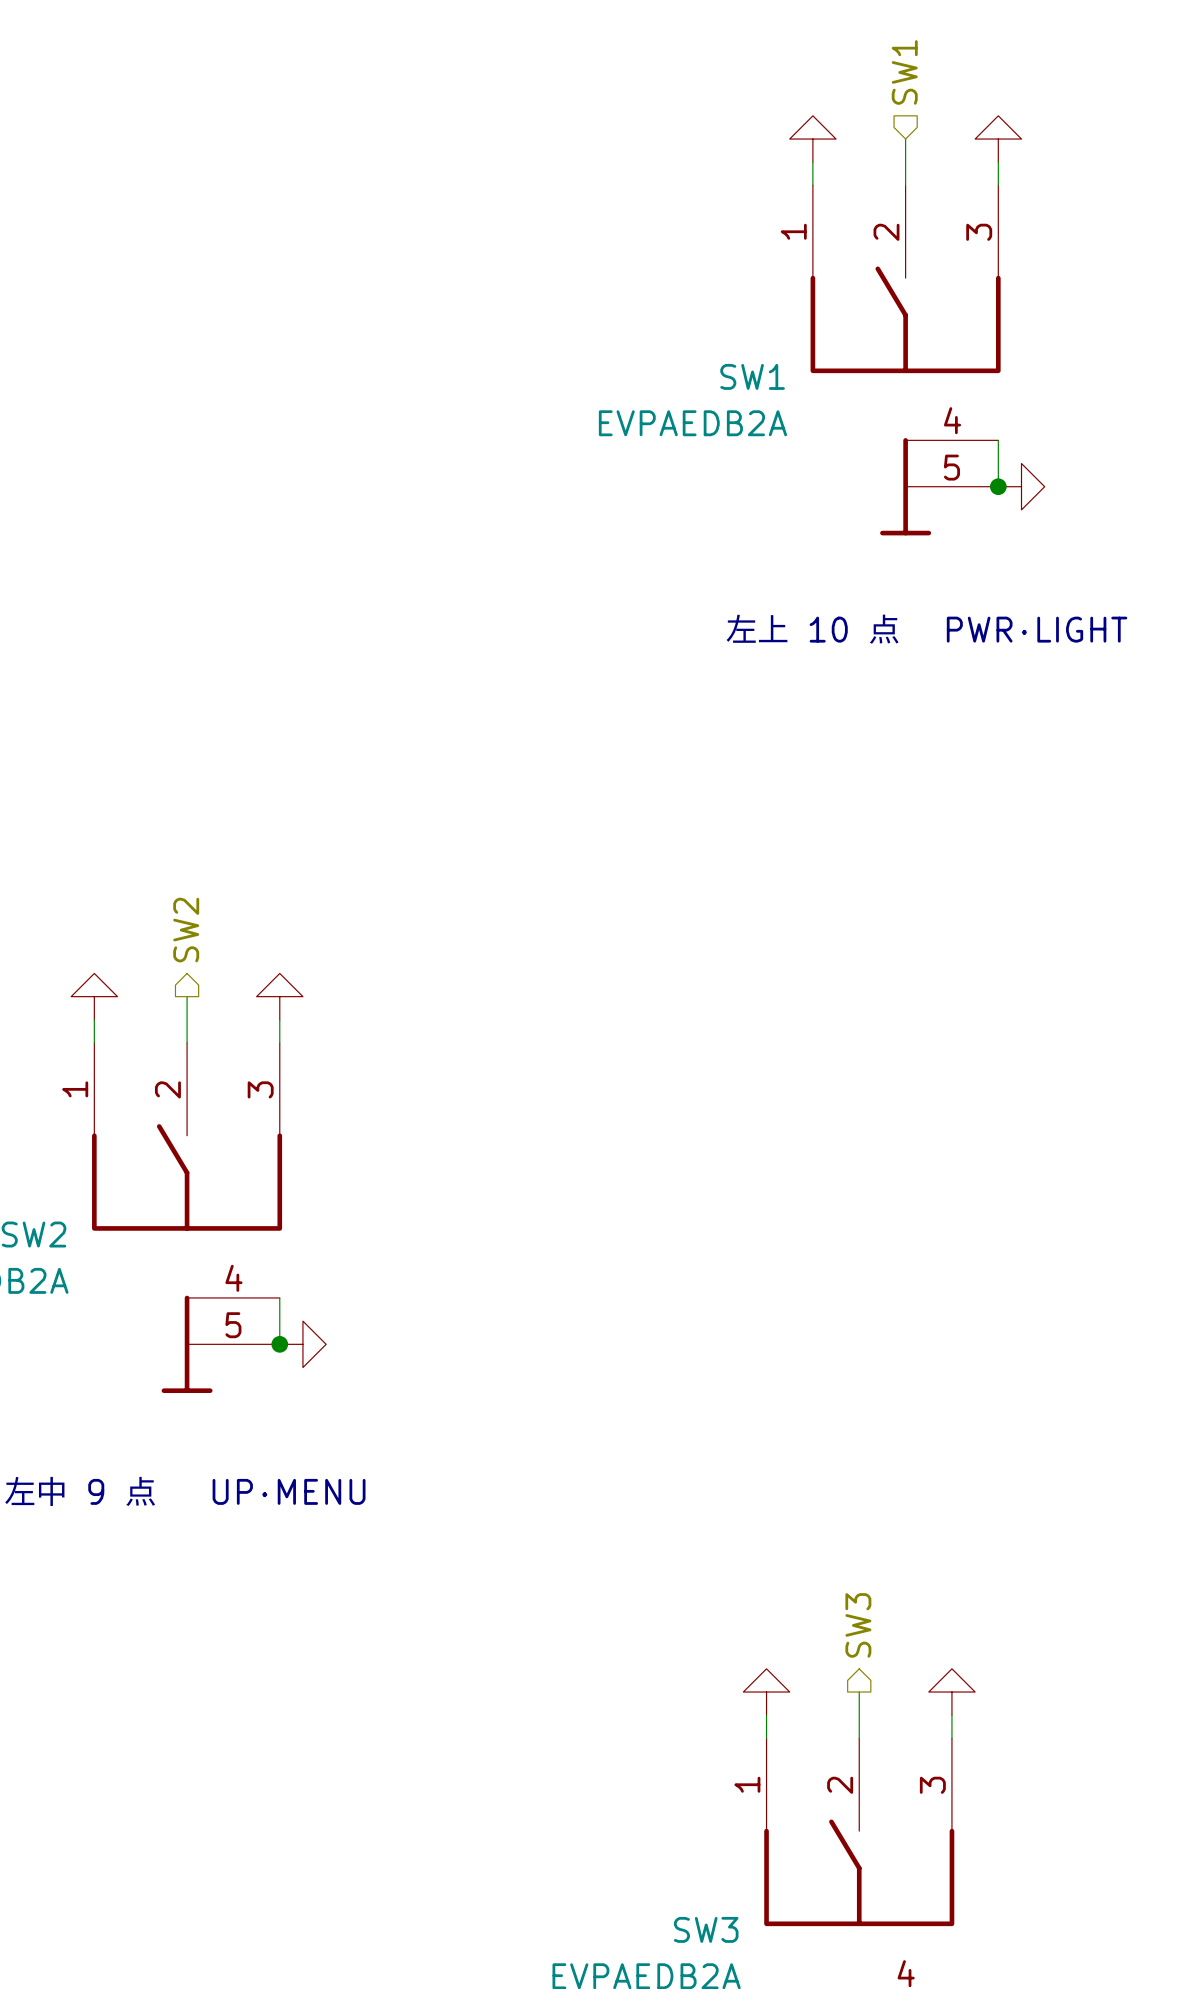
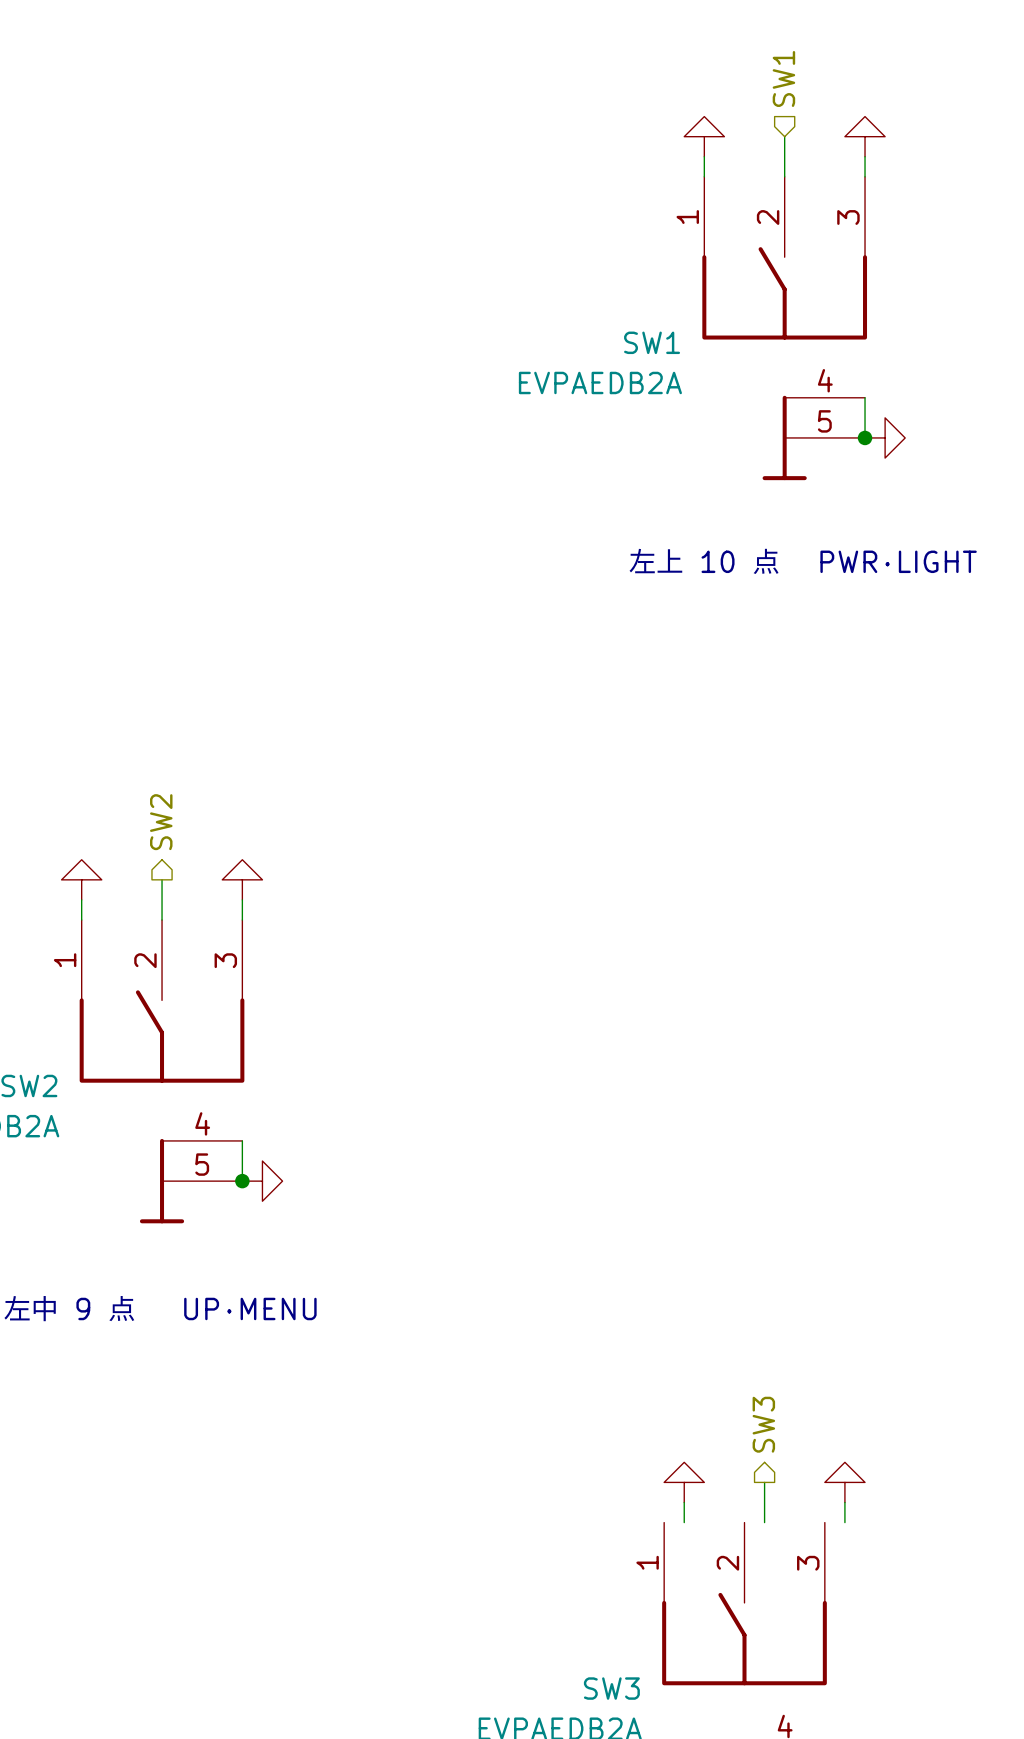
hierarchical label position: SW3 (858, 1625) -> SW3 (763, 1424)
power symbol position: (766, 1692) -> (684, 1482)
wire: (859, 1692) (859, 1738) -> (764, 1482) (764, 1522)
power symbol position: (951, 1692) -> (844, 1482)
wire: (766, 1715) (766, 1738) -> (684, 1502) (684, 1522)
wire: (951, 1715) (951, 1738) -> (844, 1502) (844, 1522)

